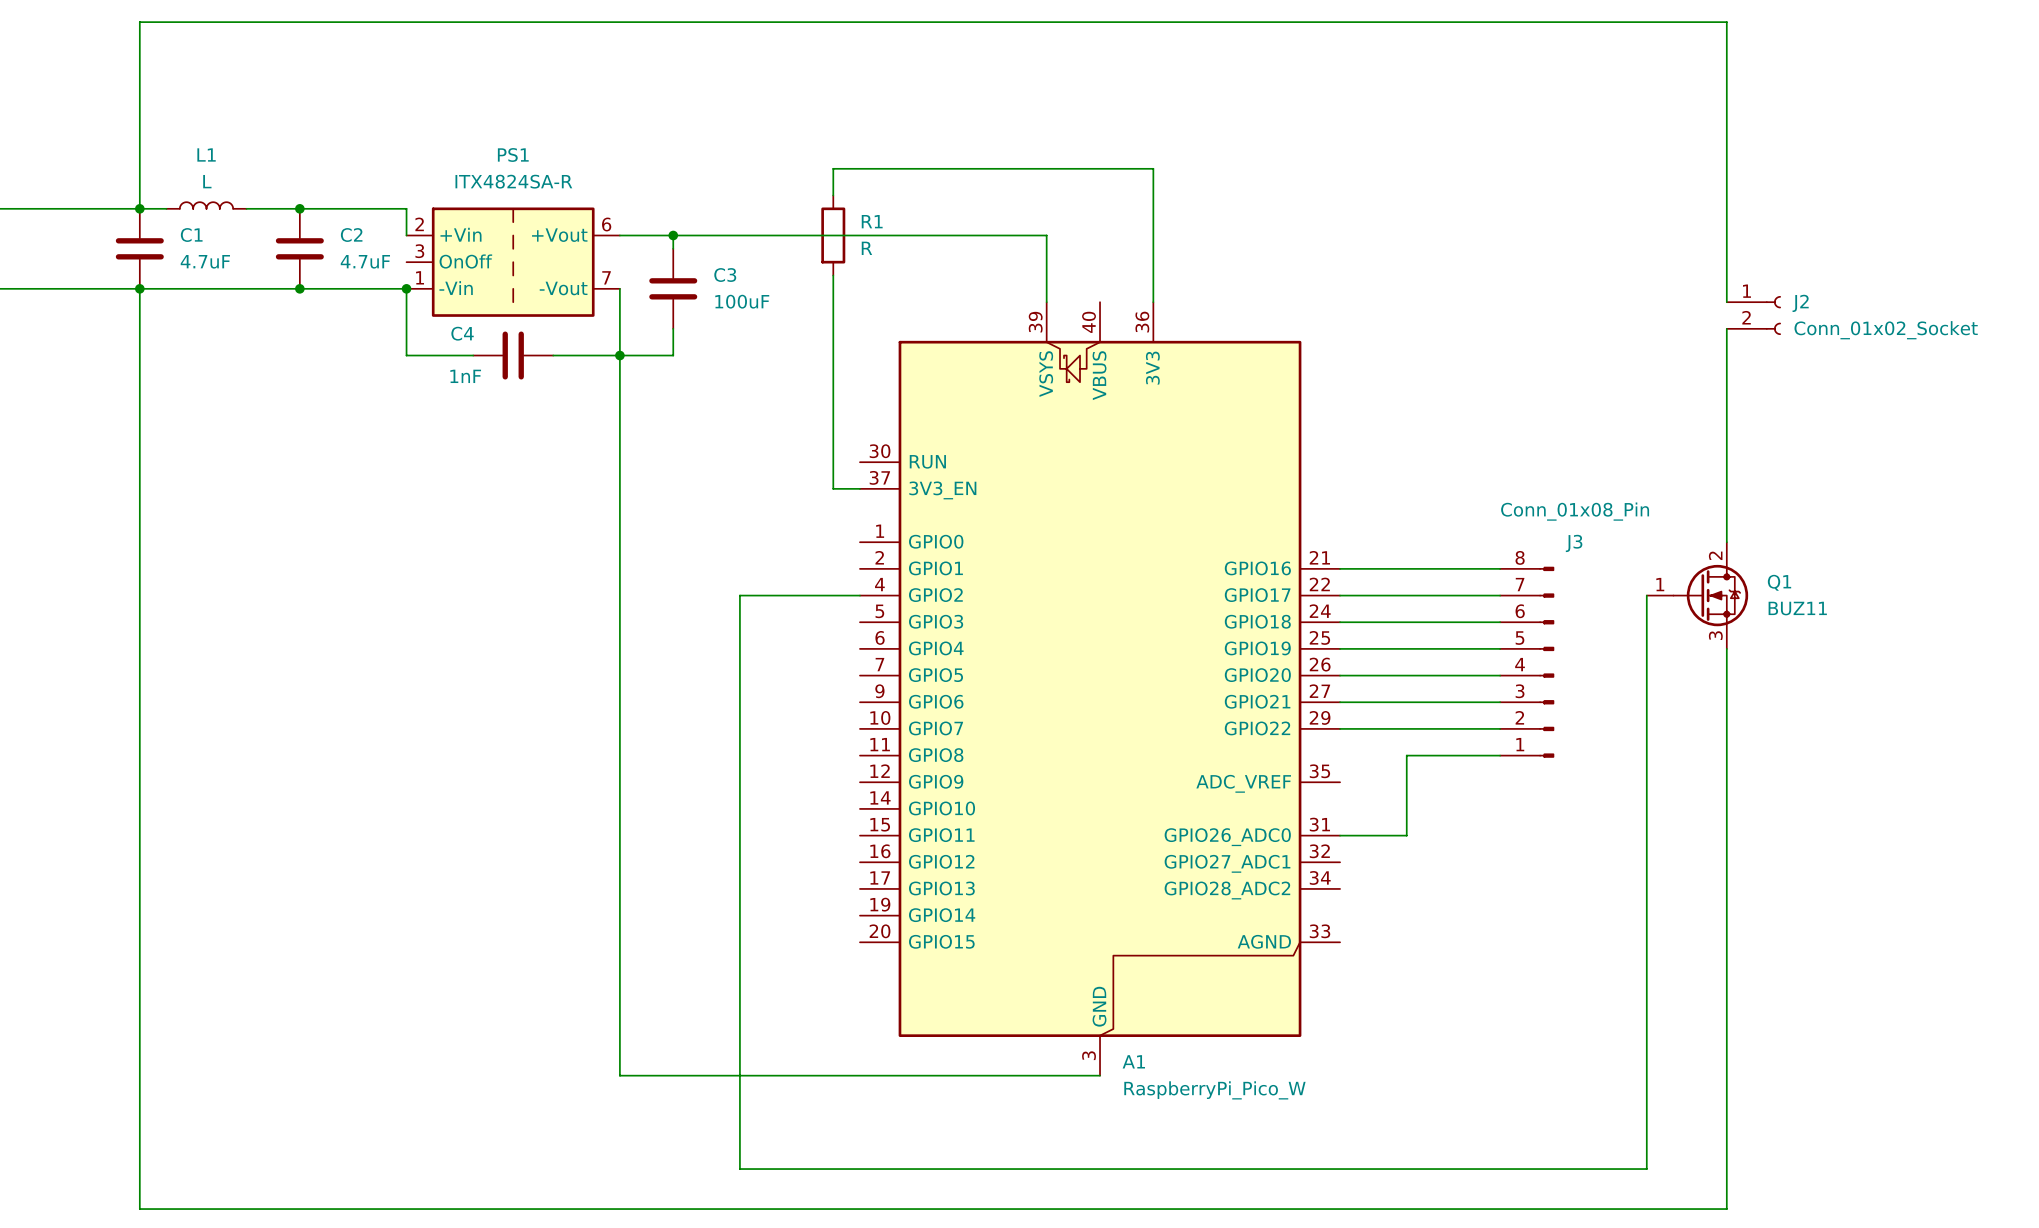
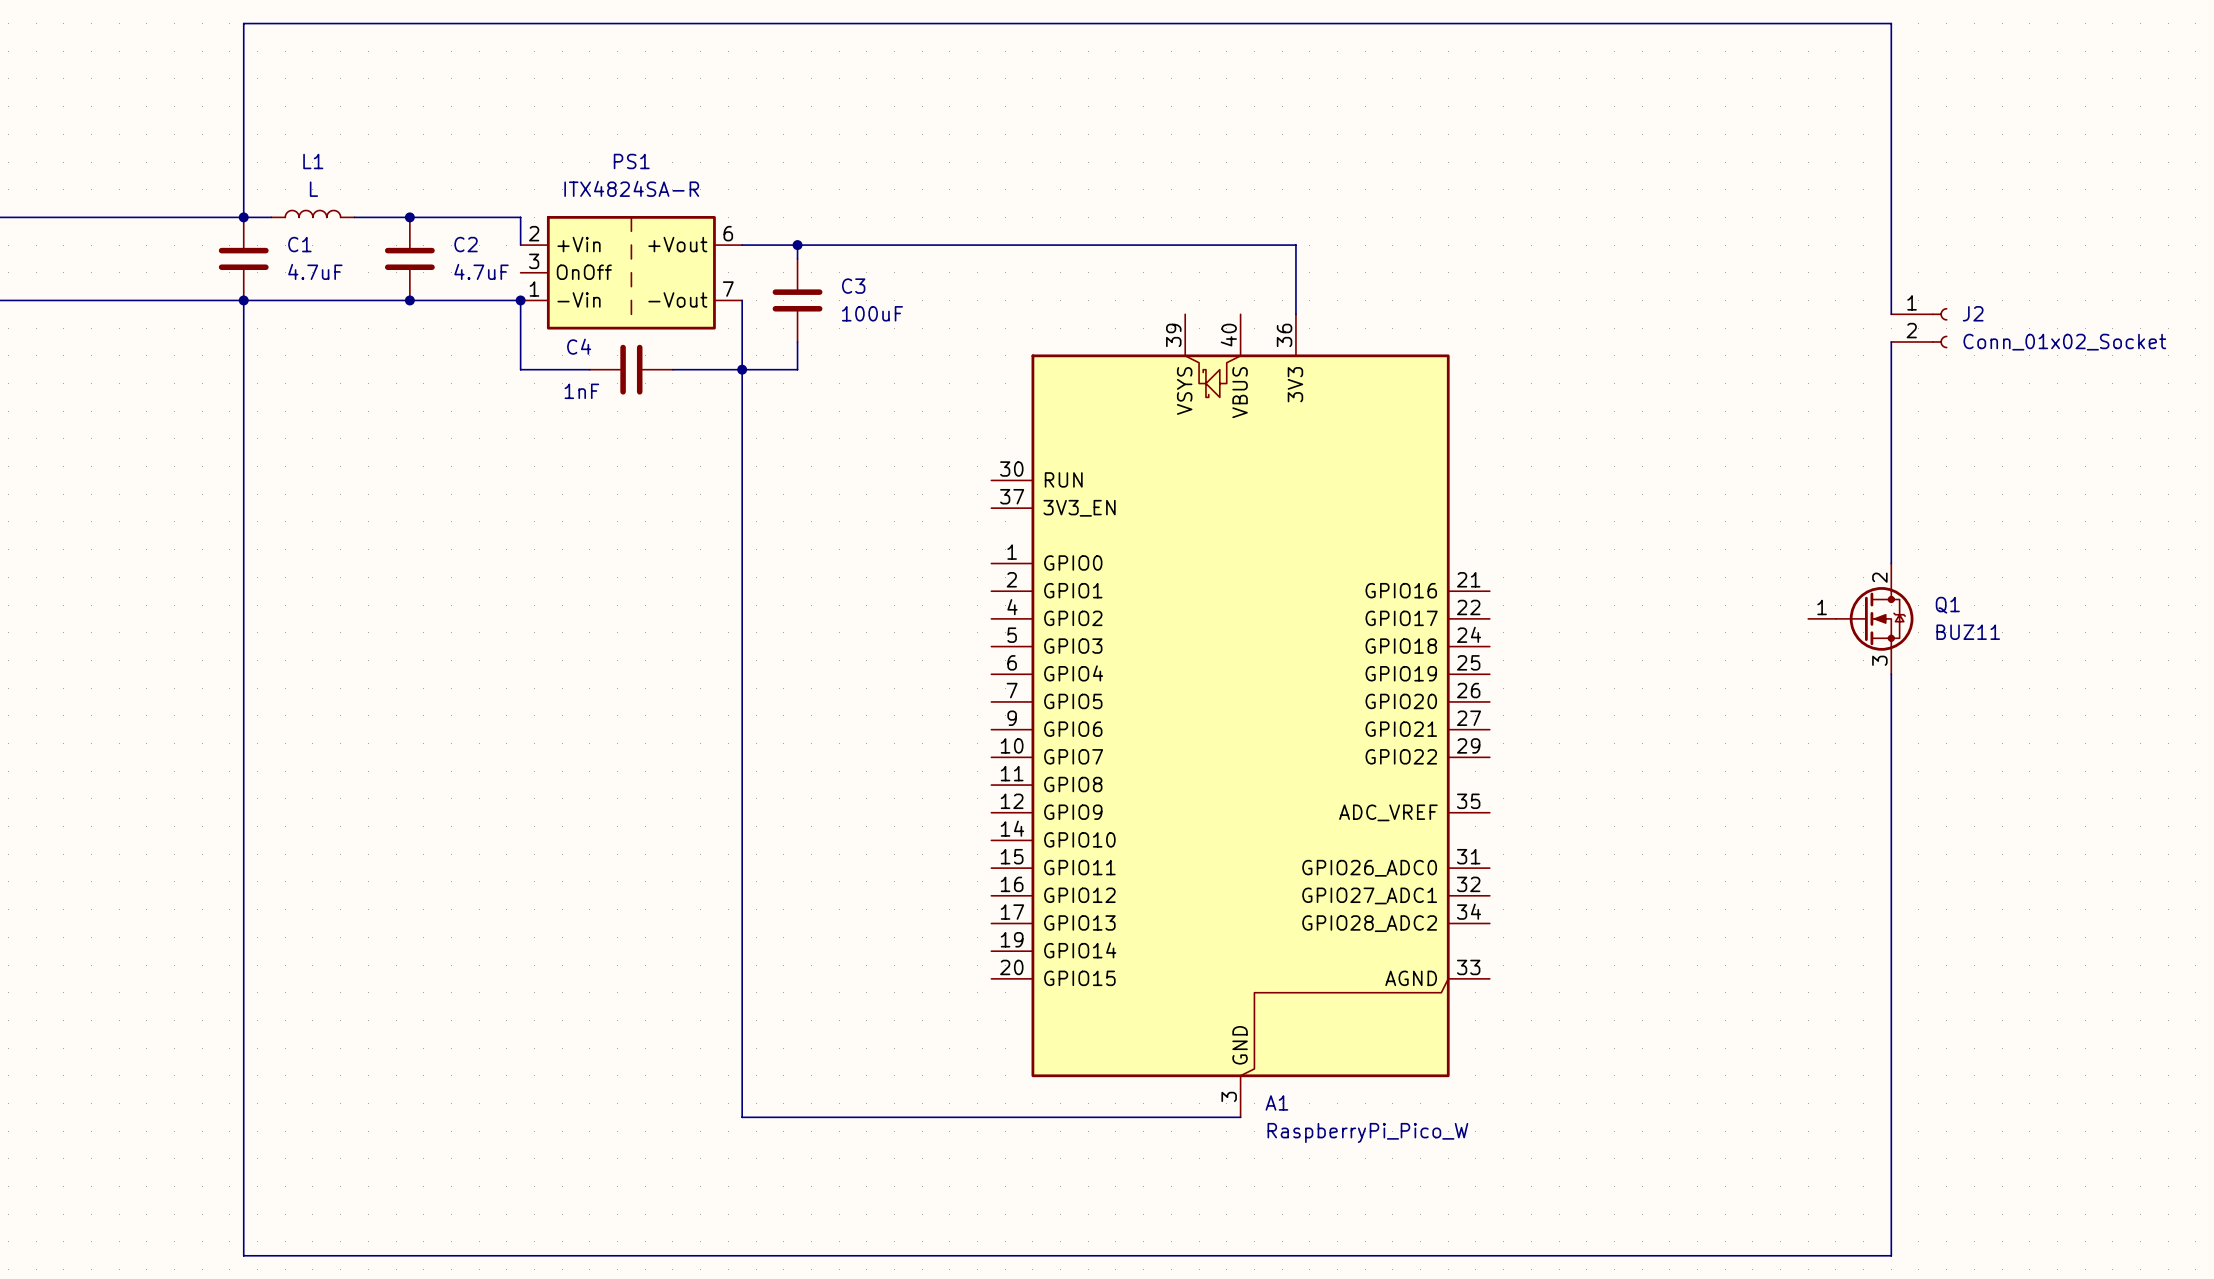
wire: (833, 195) (833, 168) (1153, 168) (1153, 235) -> none
R1: R (833, 235) -> none
wire: (1046, 235) (1046, 302) -> (1185, 245) (1295, 245)
wire: (833, 275) (833, 488) (859, 488) -> none
wire: (1340, 568) (1500, 568) -> none
wire: (859, 595) (739, 595) (739, 1169) (1646, 1169) (1646, 595) -> none
wire: (1340, 595) (1500, 595) -> none
wire: (1340, 622) (1500, 622) -> none
wire: (1340, 648) (1500, 648) -> none
J3: Conn_01x08_Pin (1527, 662) -> none
wire: (1340, 675) (1500, 675) -> none
wire: (1340, 702) (1500, 702) -> none
wire: (1340, 728) (1500, 728) -> none
wire: (1500, 755) (1406, 755) (1406, 835) (1340, 835) -> none

